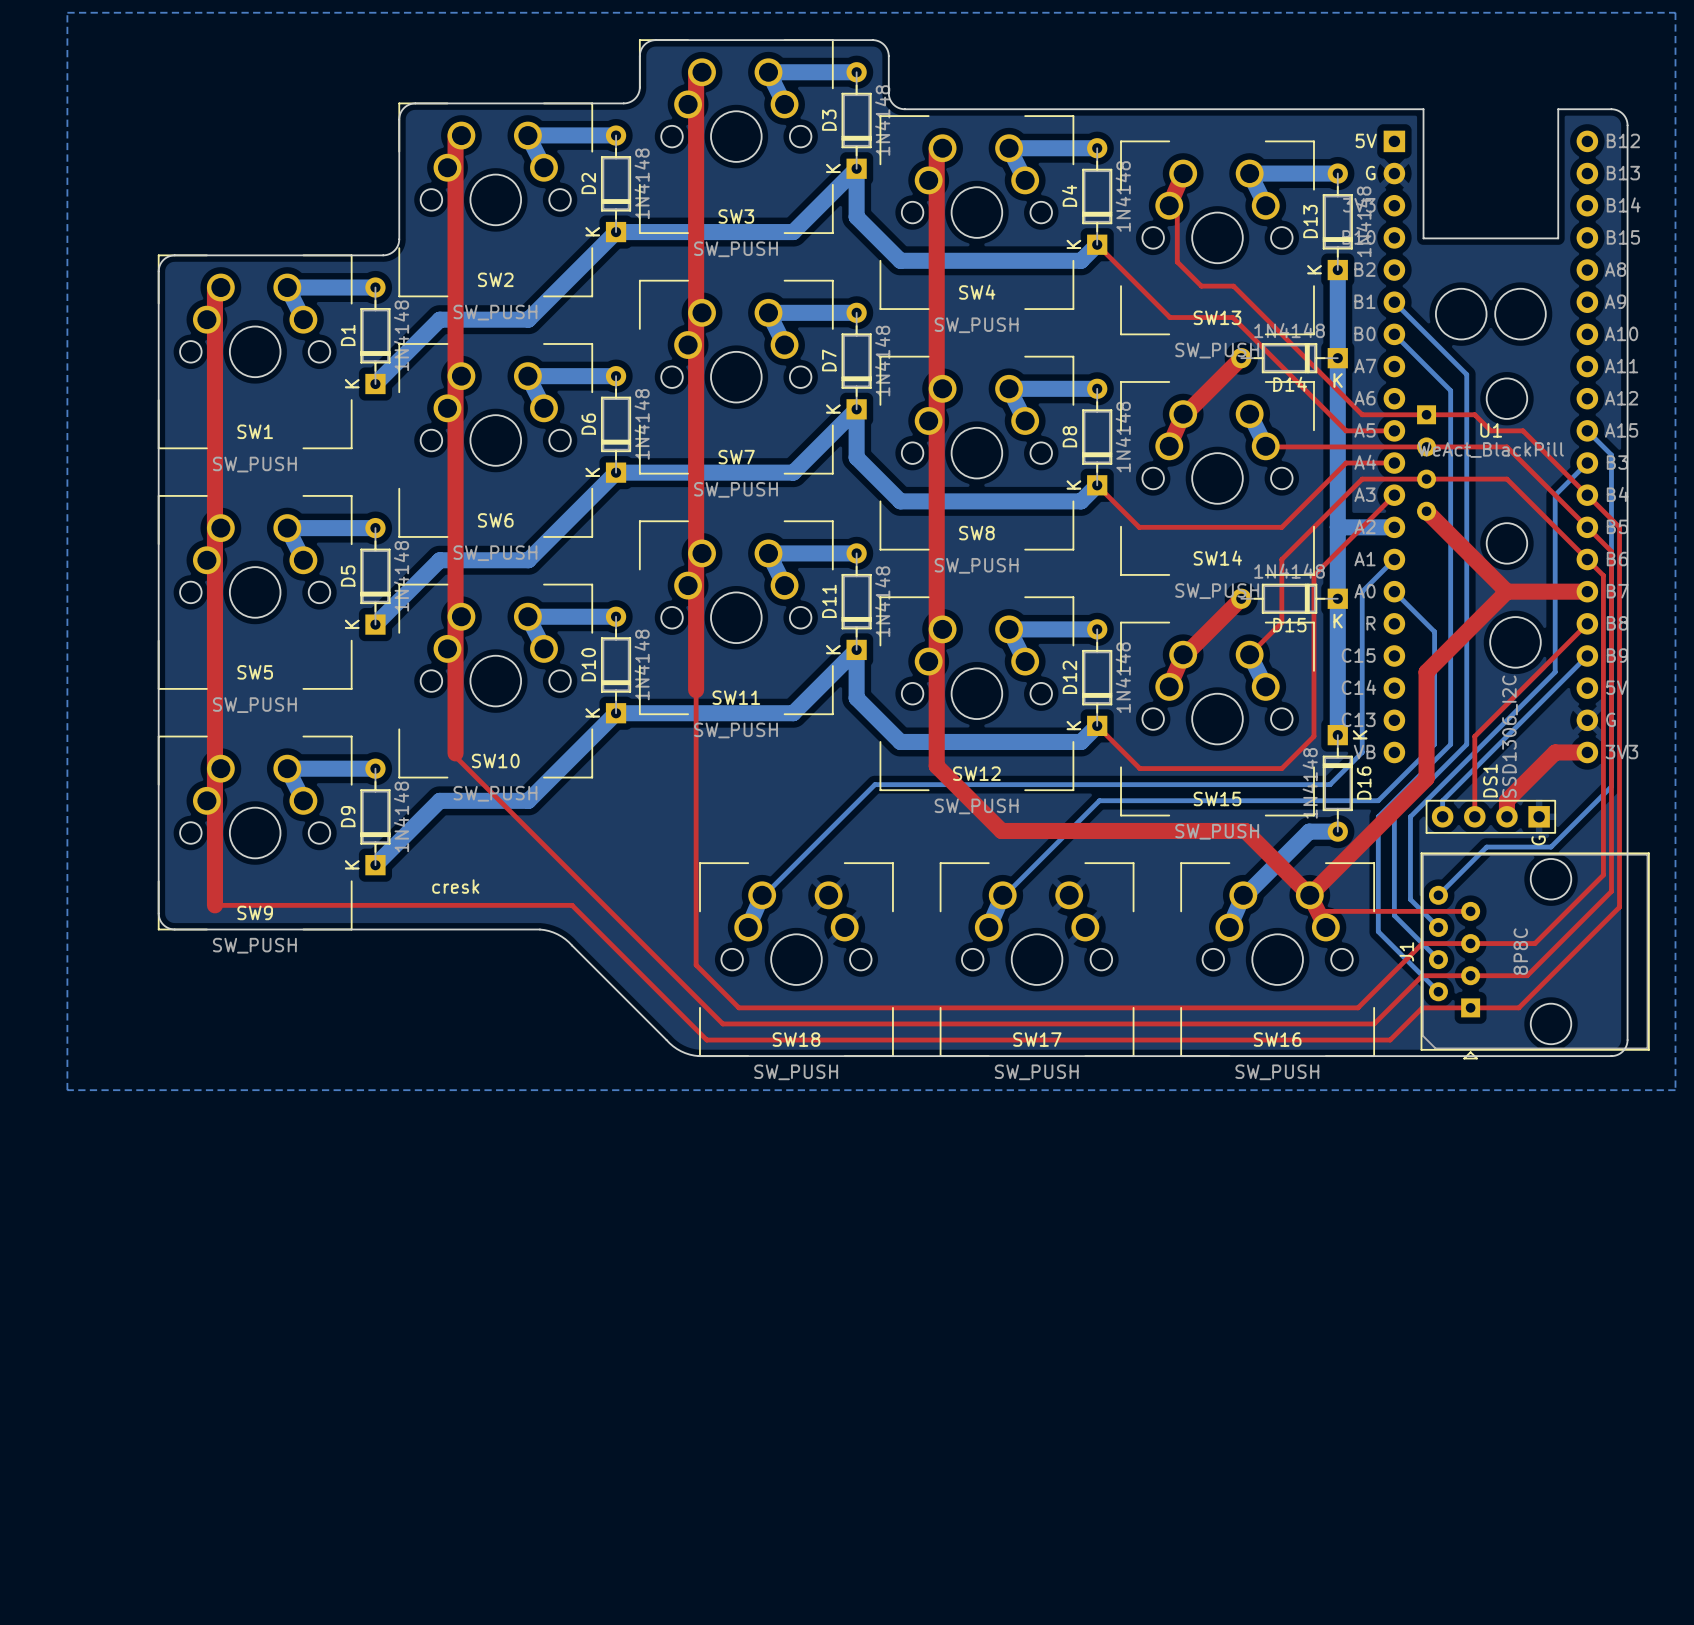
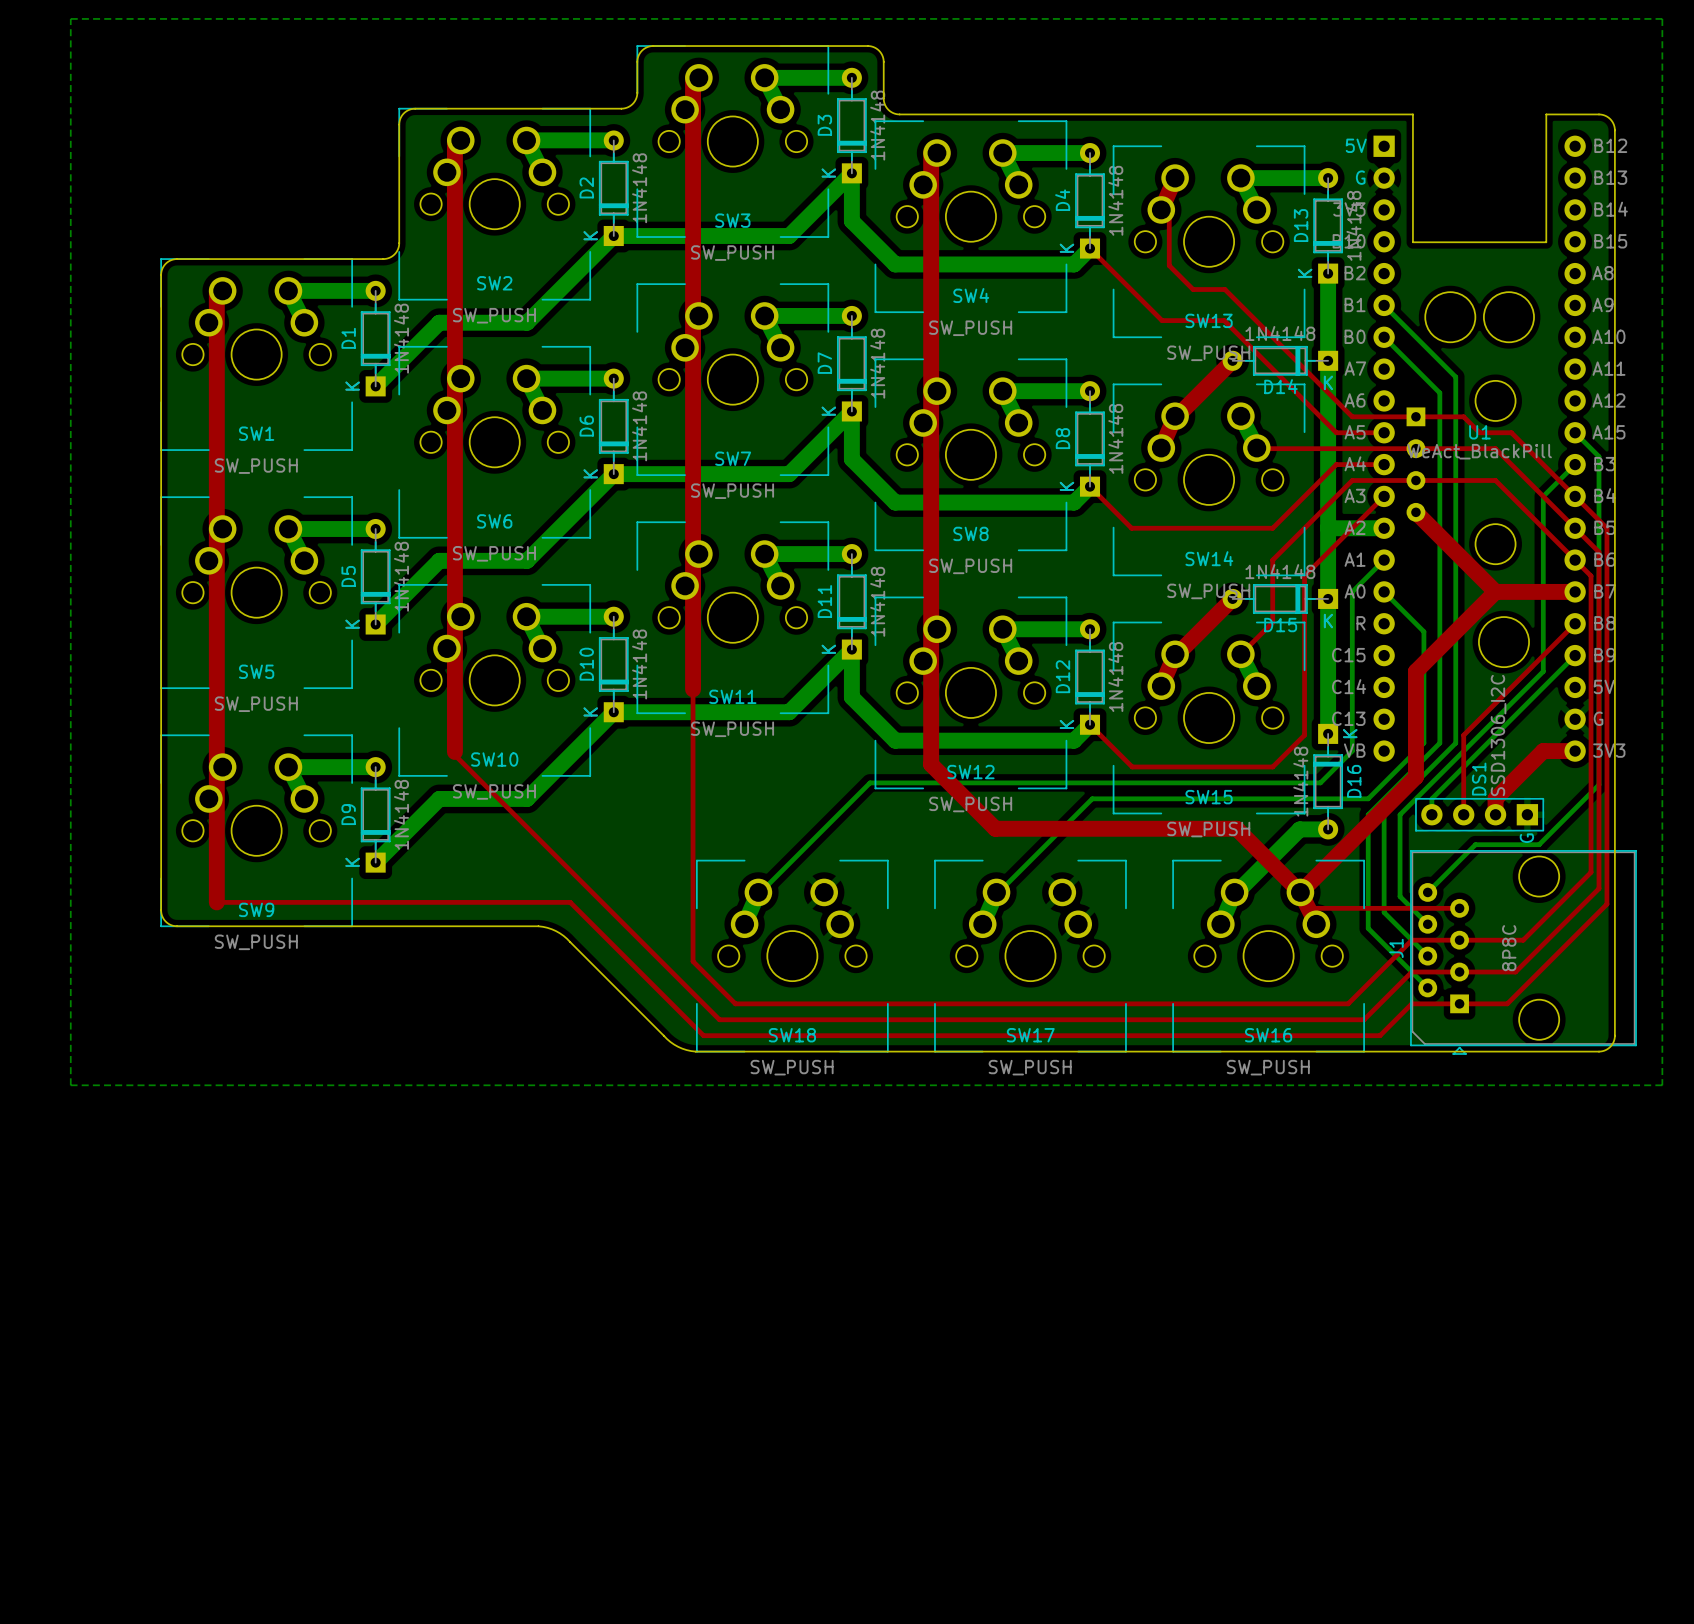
text: cresk (455, 886) -> none

